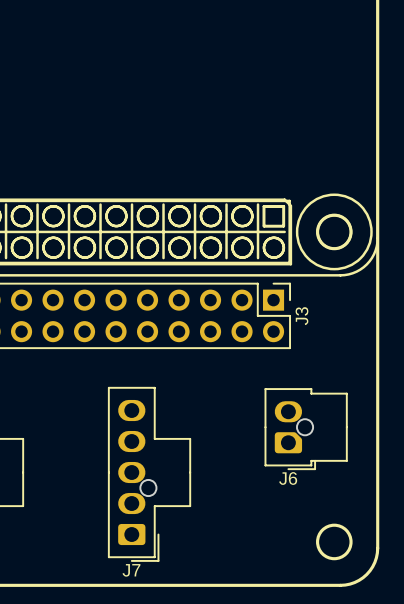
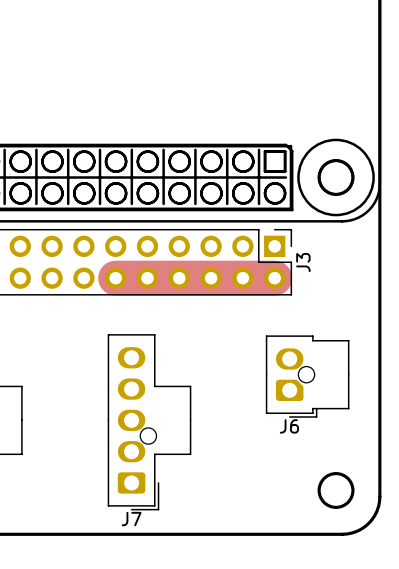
top track: none -> (115, 278) (274, 278)

